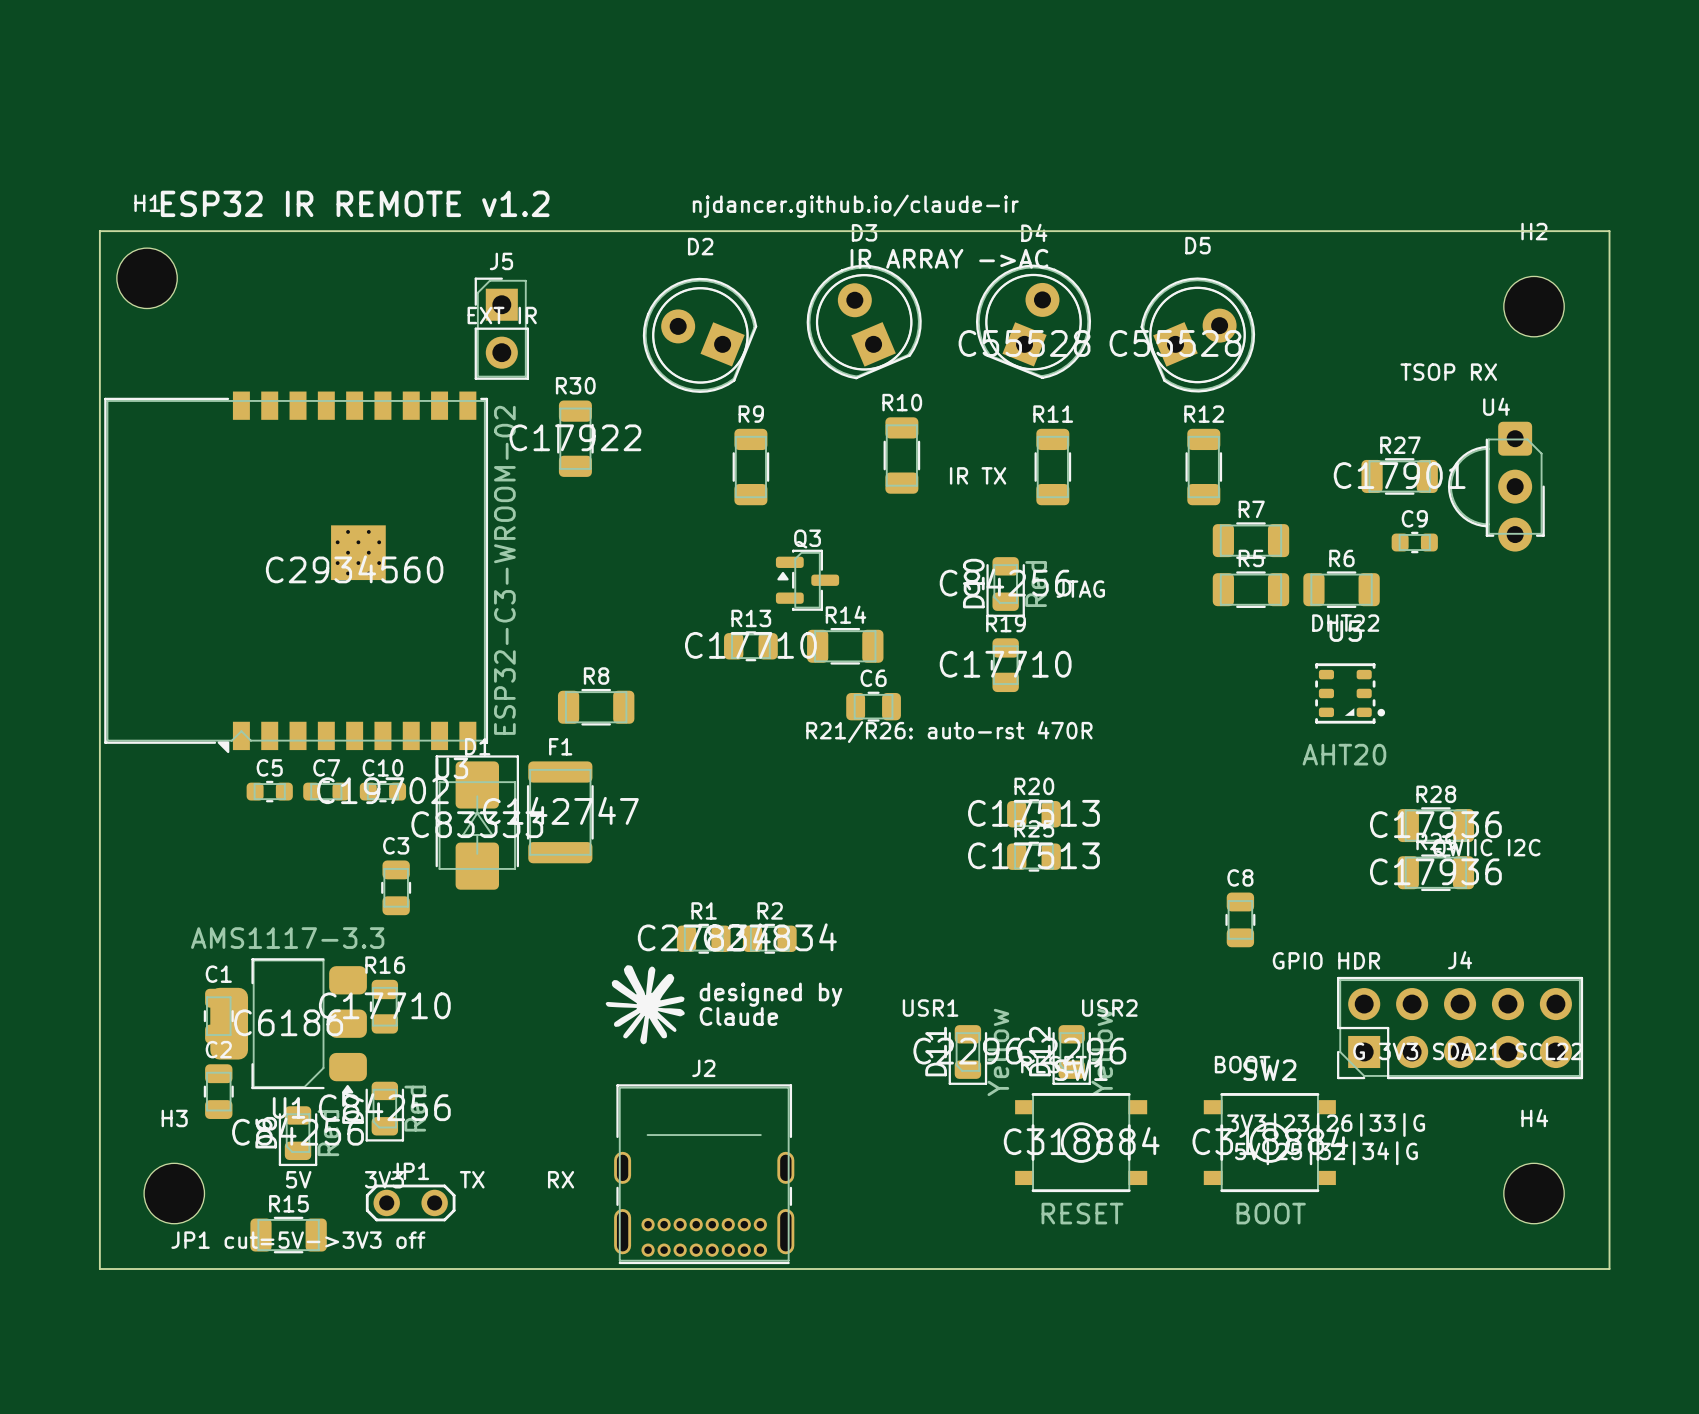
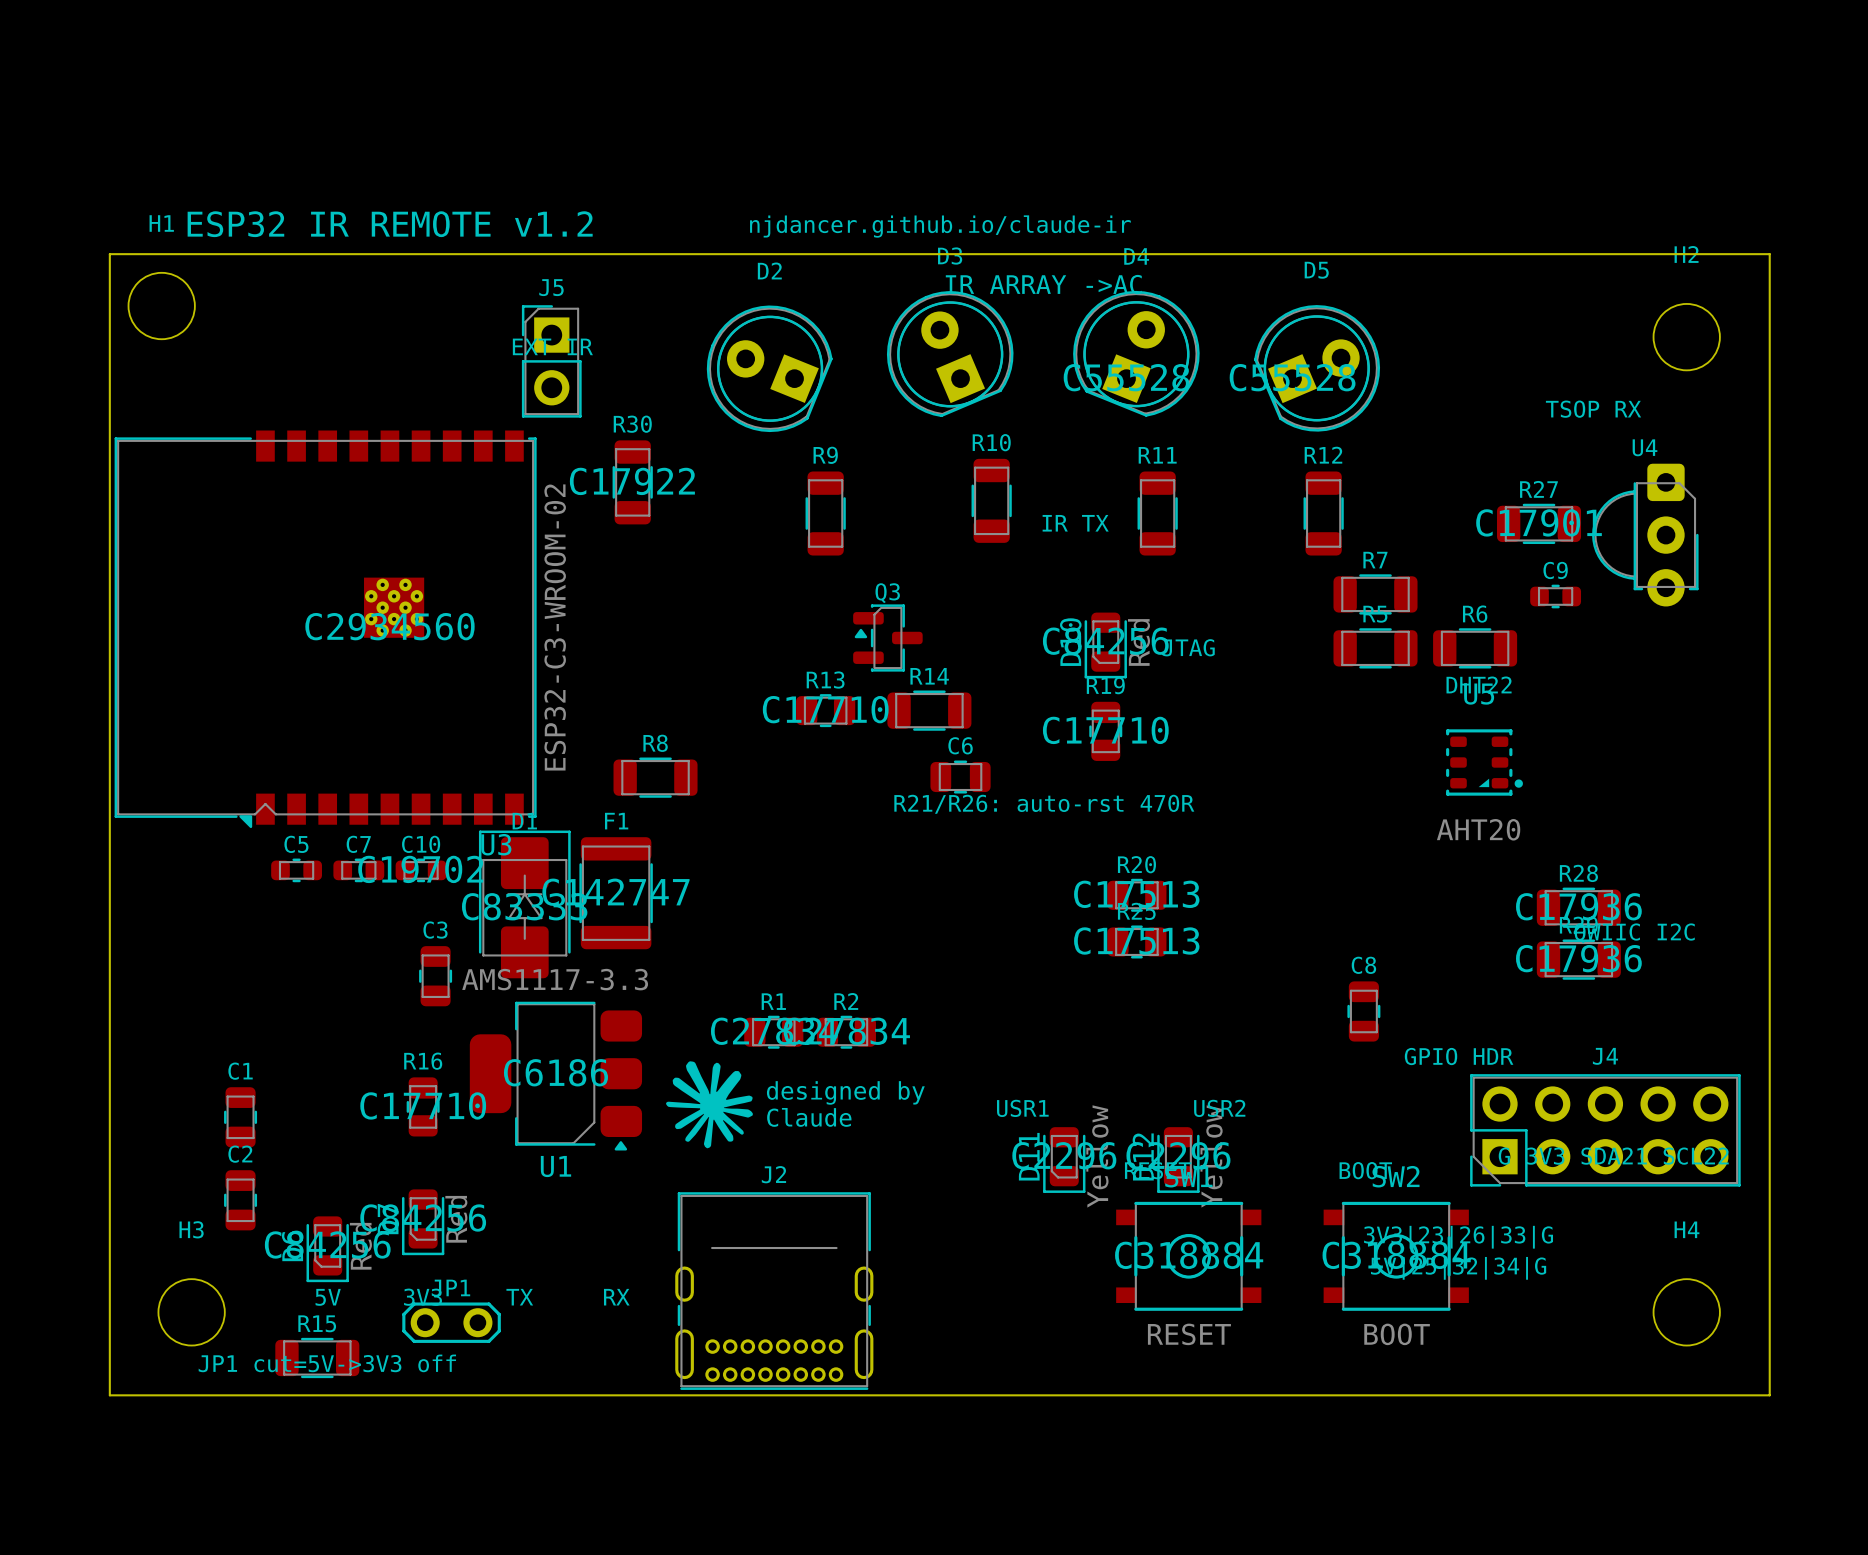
U1 position: (288, 1025) -> (555, 1076)

